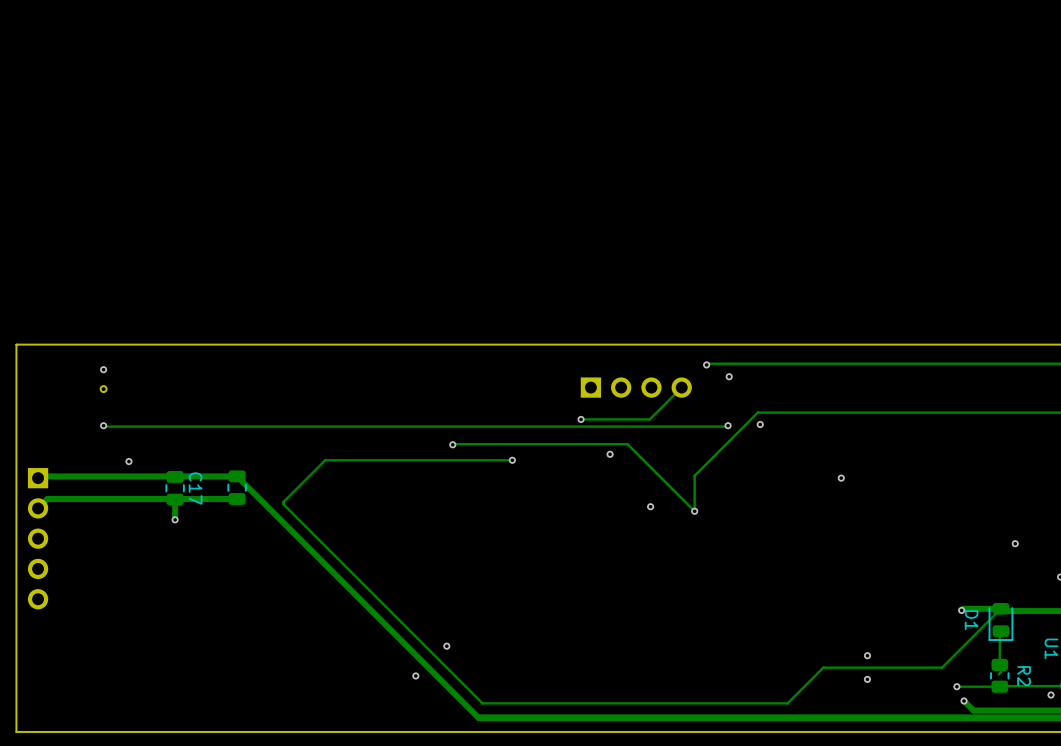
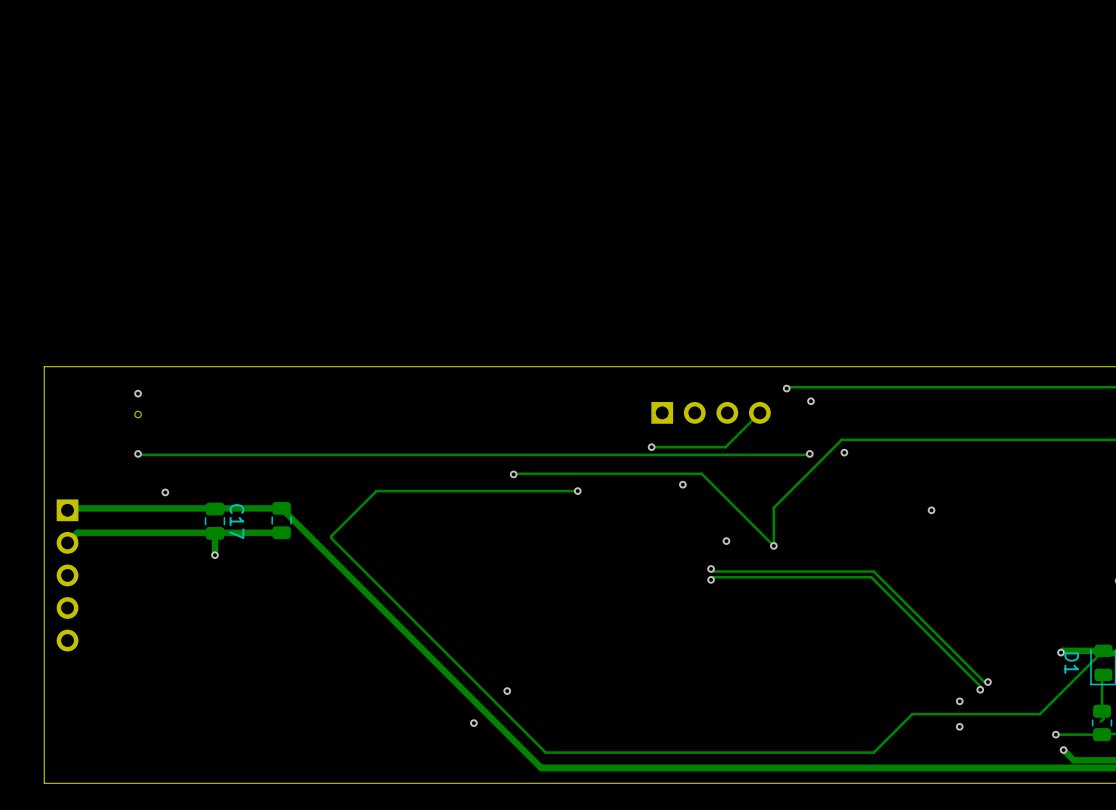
track: none -> (711, 568) (713, 571) (873, 571) (984, 682) (987, 682)
via: none -> (711, 568)
track: none -> (711, 579) (713, 577) (871, 577) (980, 686) (980, 689)
via: none -> (711, 579)
via: none -> (987, 682)
via: none -> (980, 689)

